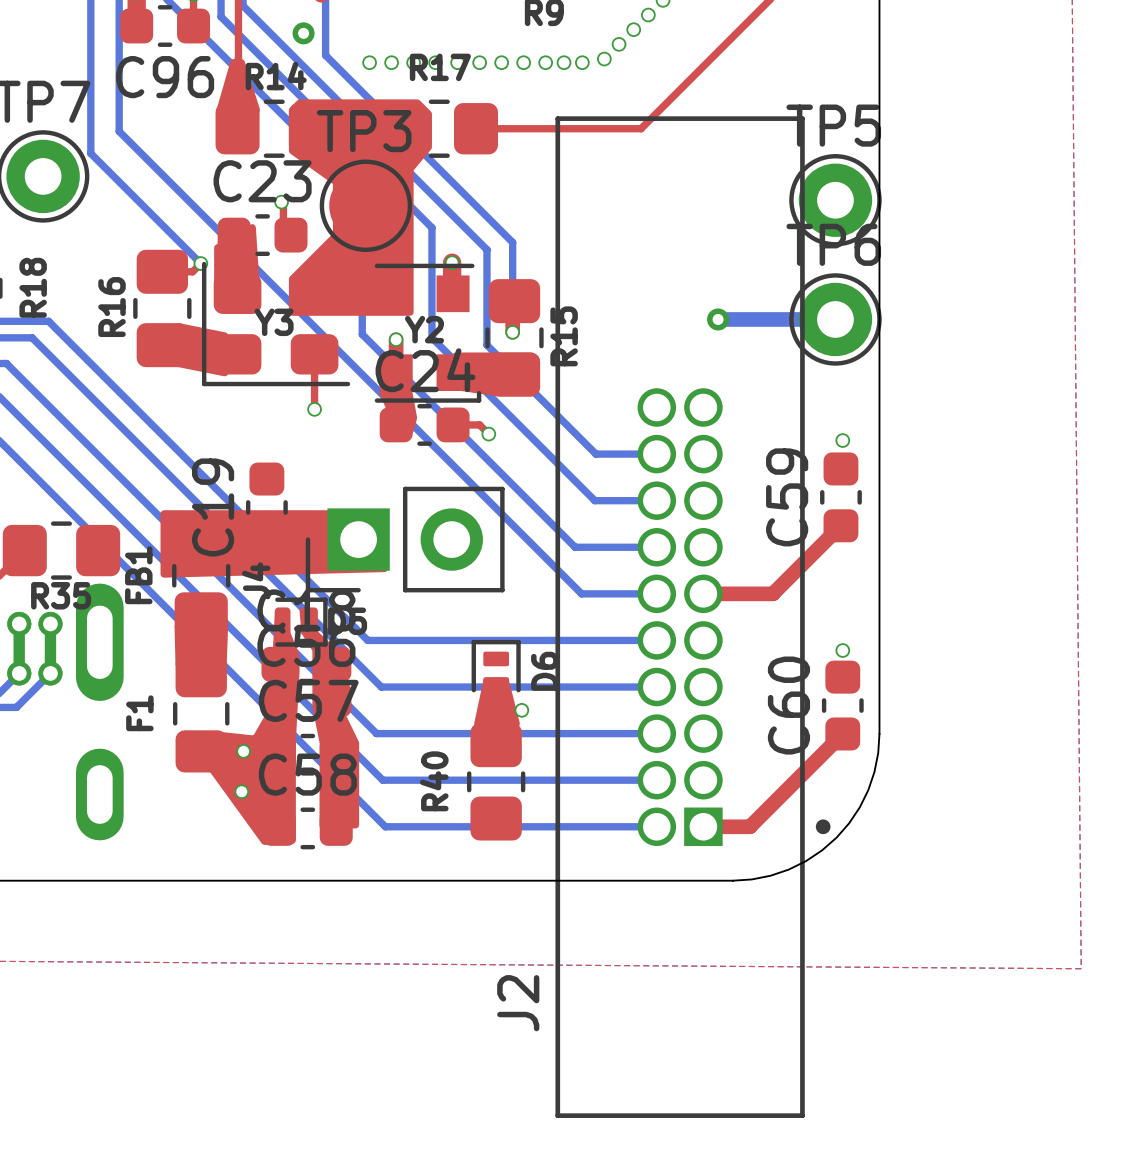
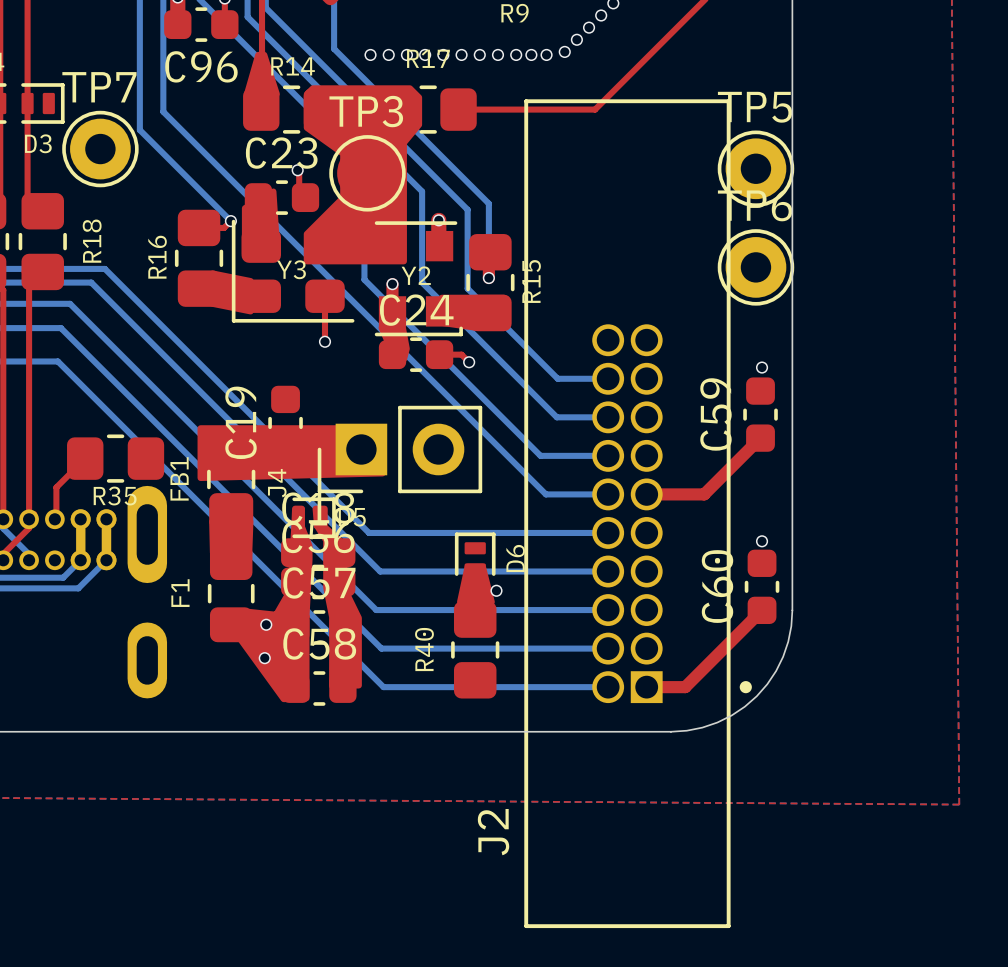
via: (303, 33) -> none
bottom track: (718, 319) (835, 319) -> none
via: (718, 319) -> none

